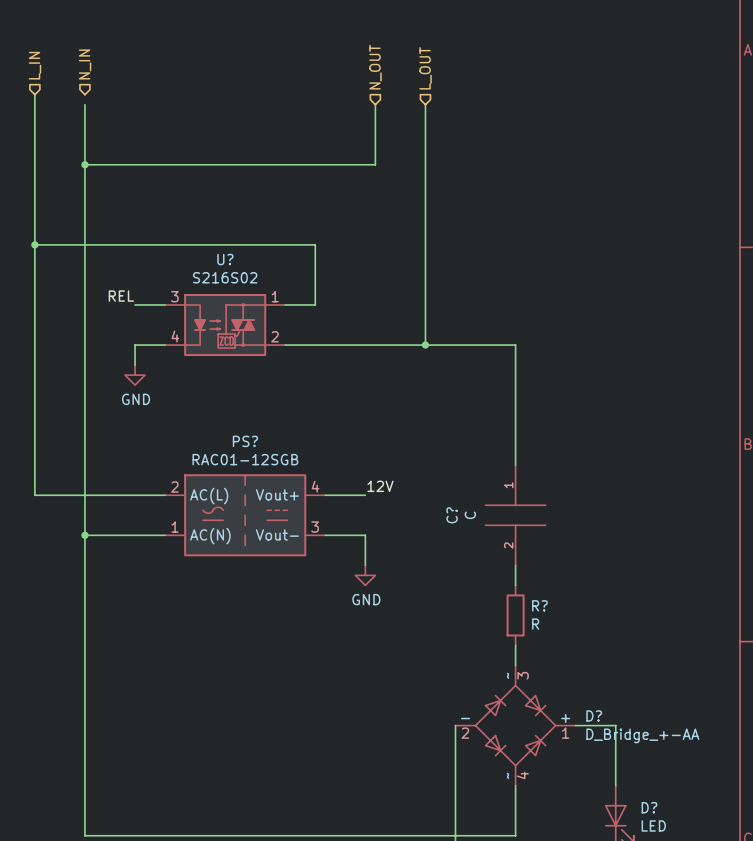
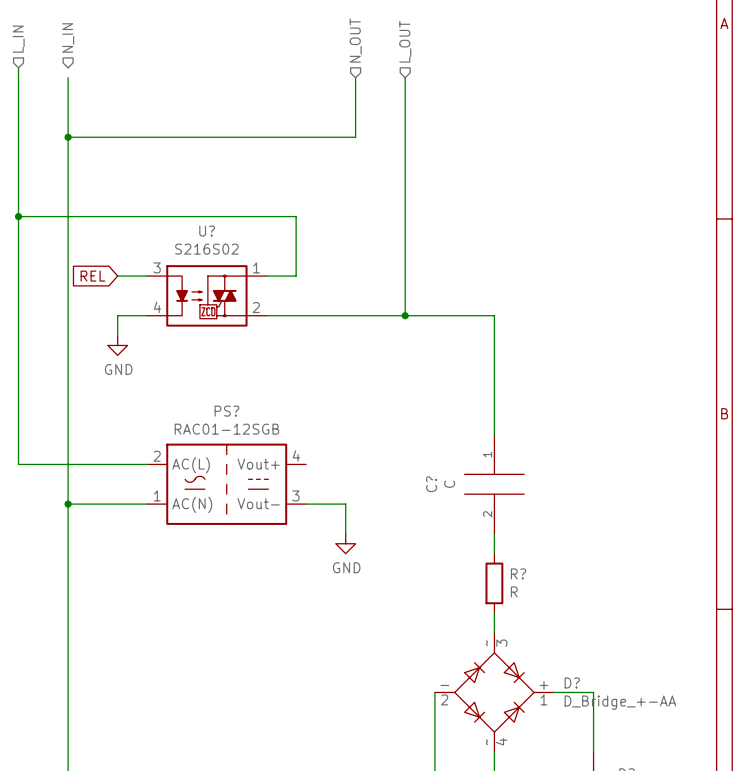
label: REL (121, 296) -> none
global label: none -> REL (92, 276)
label: 12V (380, 486) -> none
wire: (325, 495) (365, 495) -> none

